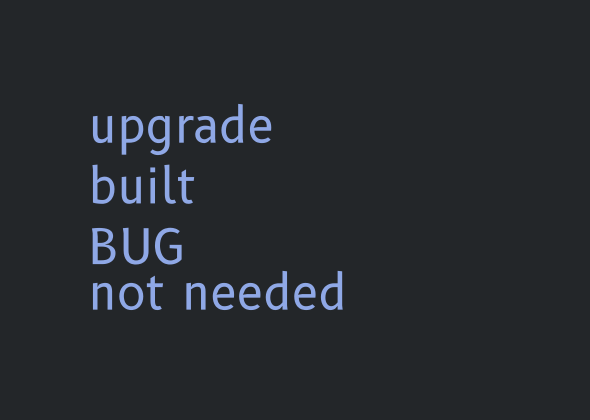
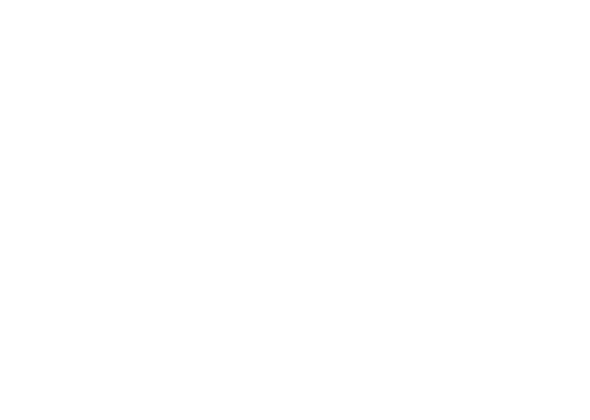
text: upgrade (182, 129) -> none
text: built (143, 184) -> none
text: BUG (136, 246) -> none
text: not needed (217, 290) -> none

